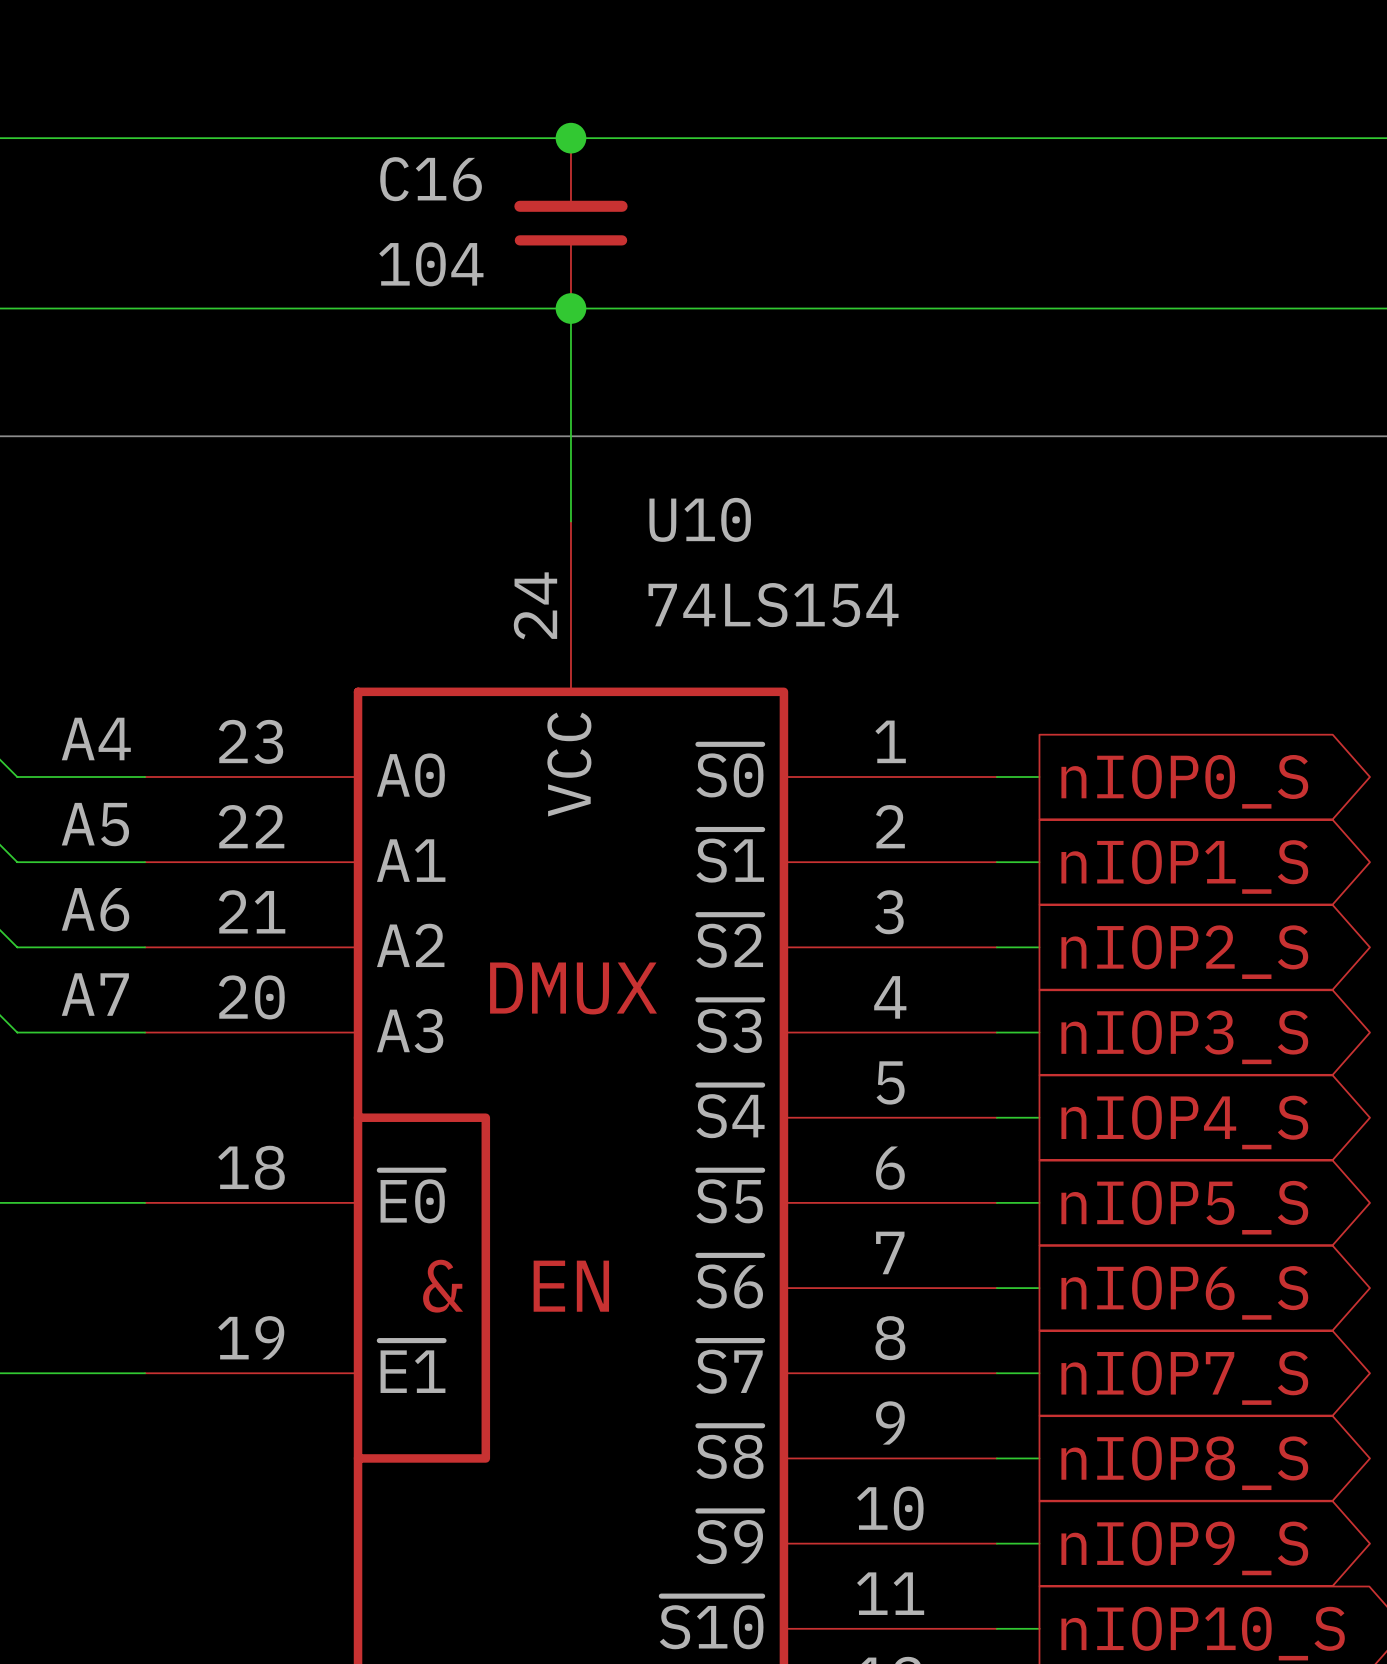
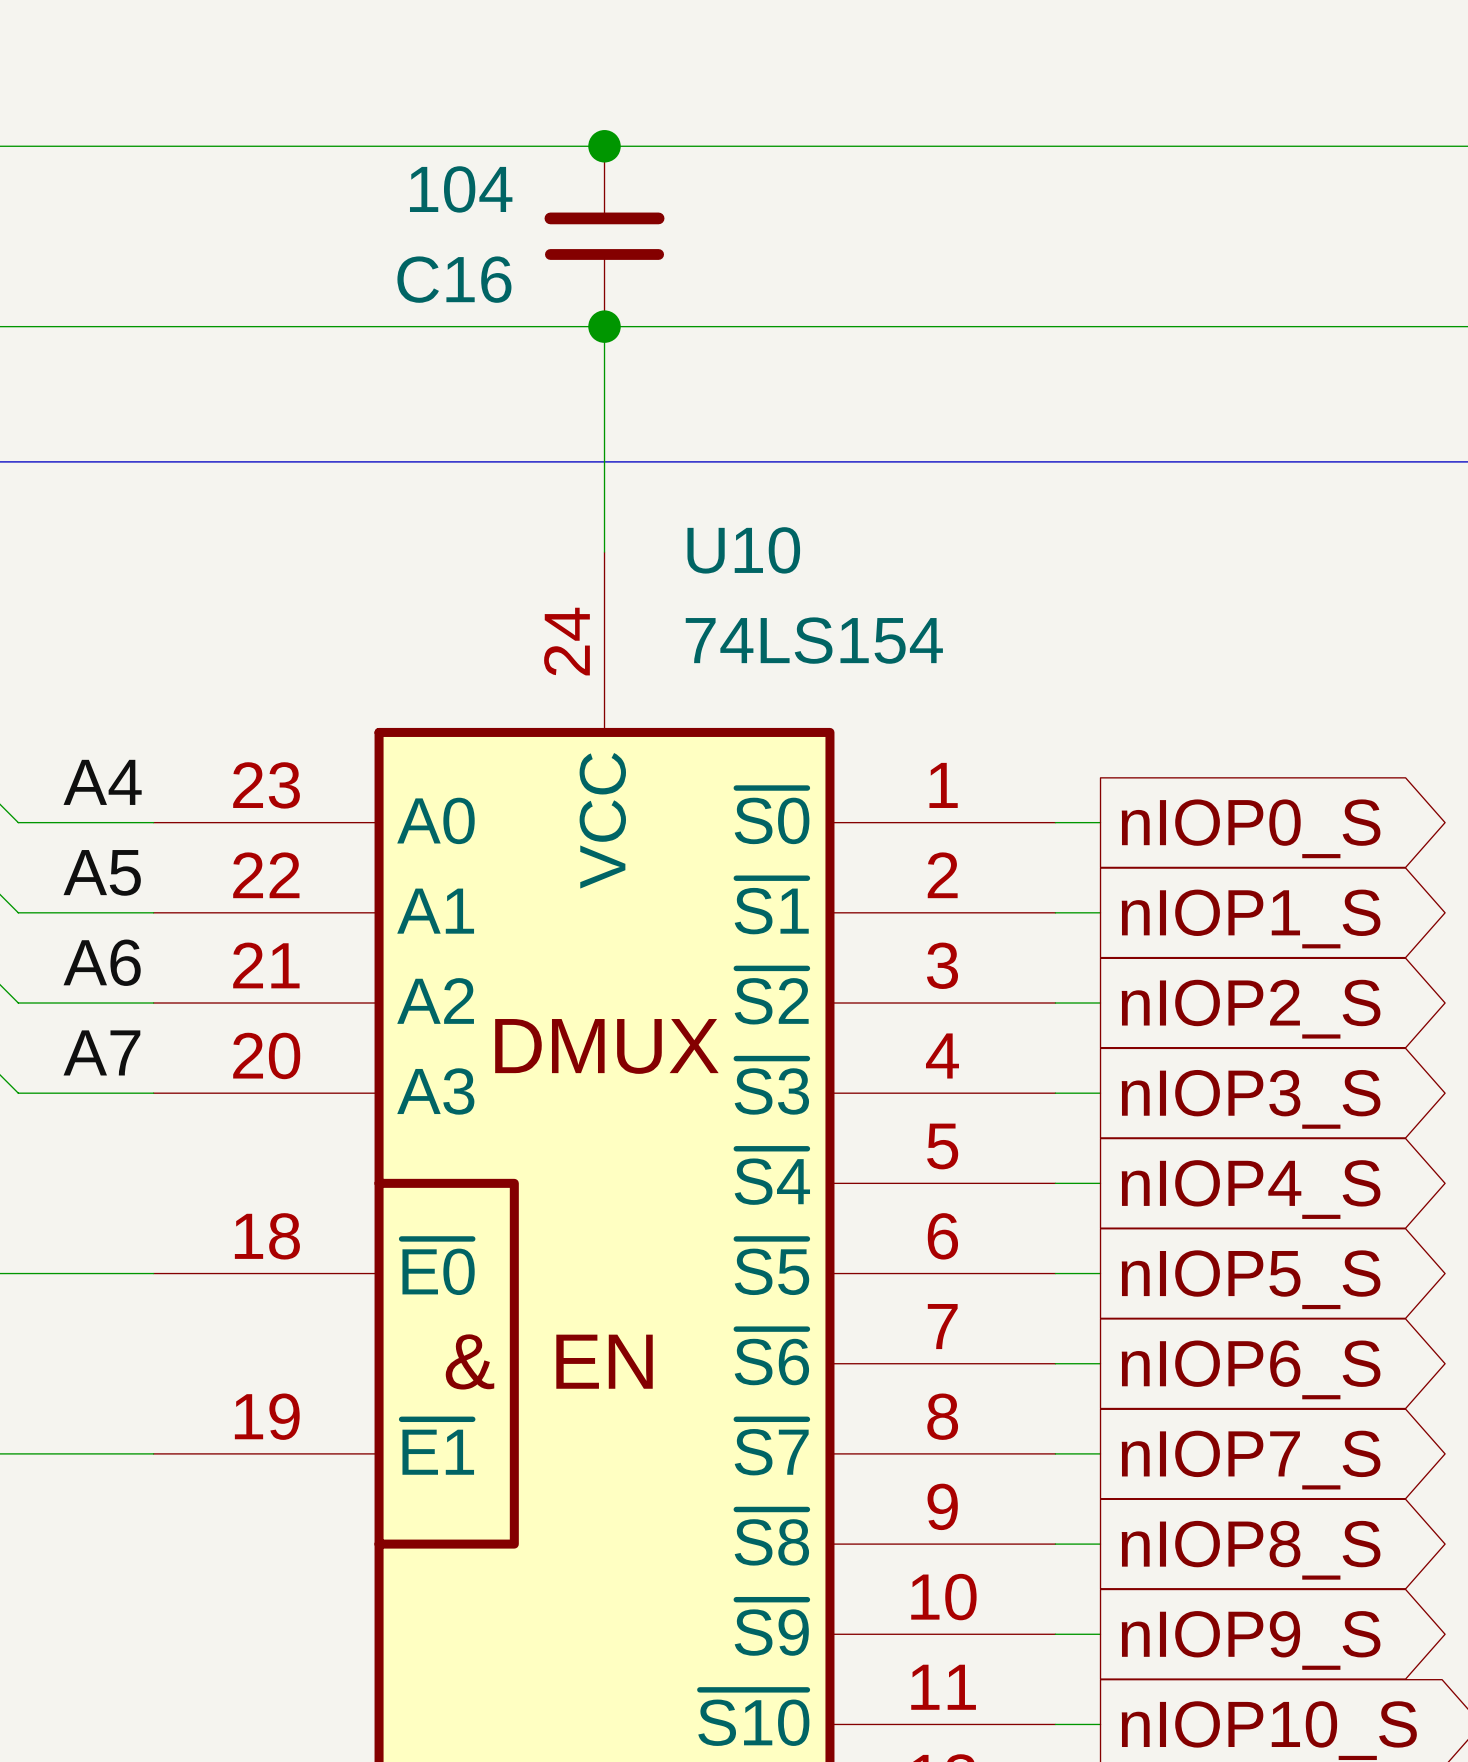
C16 name position: C16 (431, 179) -> C16 (454, 279)
C16 value position: 104 (431, 264) -> 104 (461, 189)

